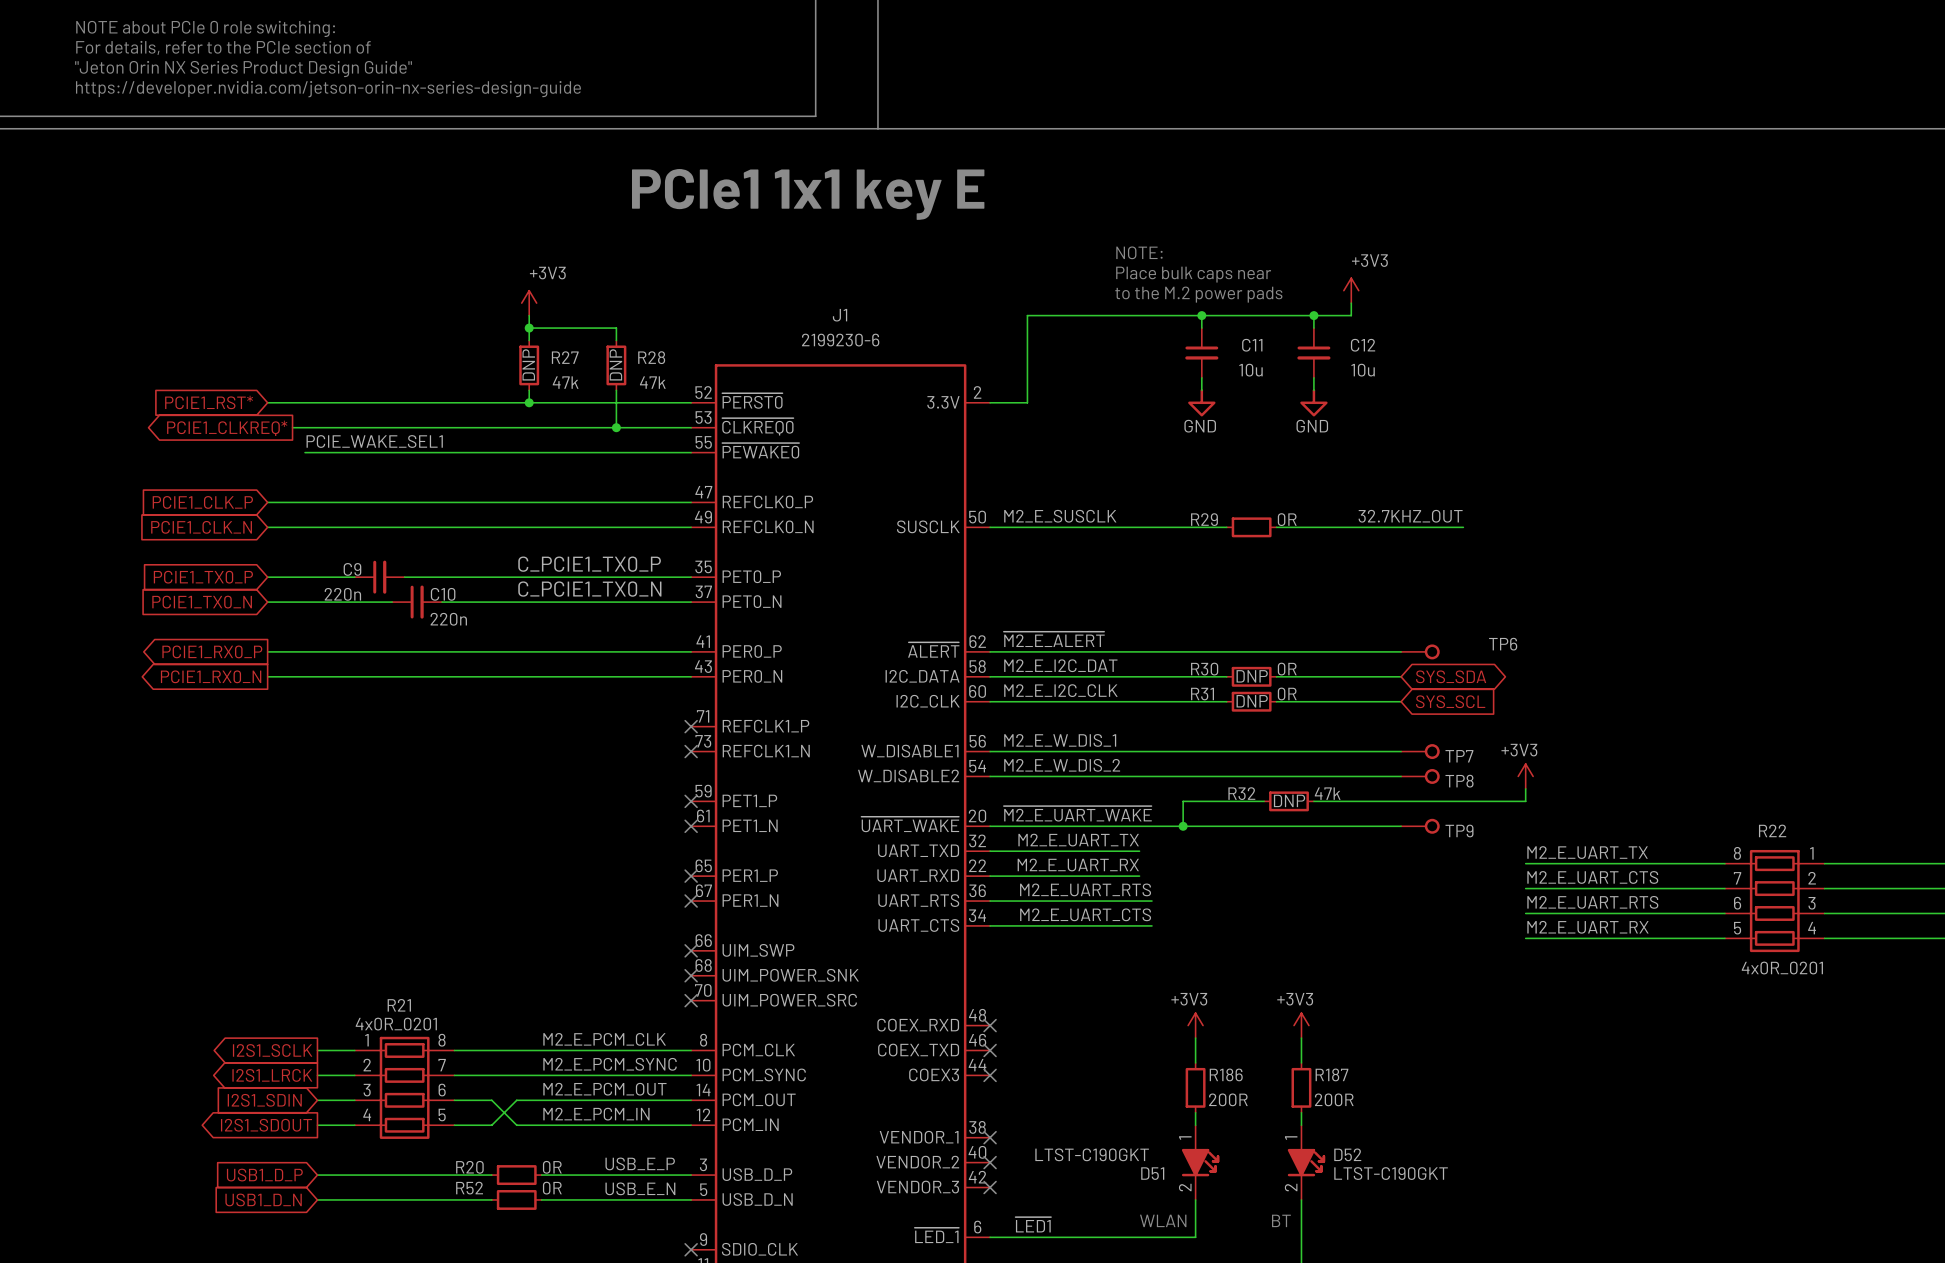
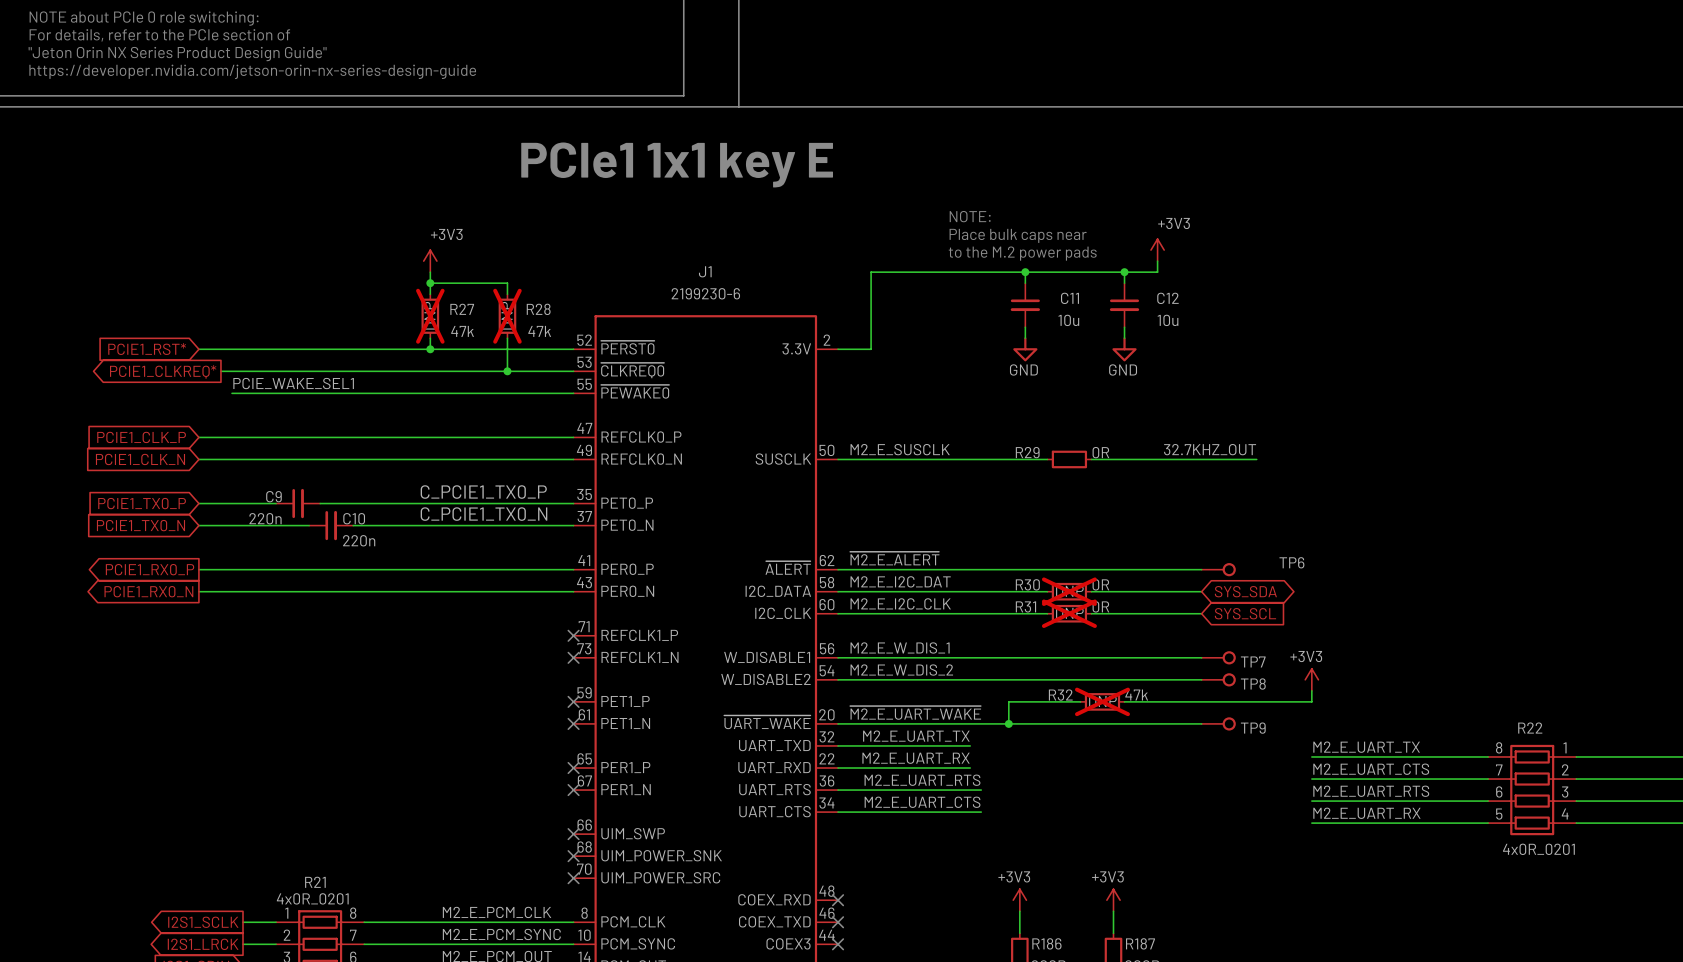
R27 do-not-place cross: none -> (430, 316)
R28 do-not-place cross: none -> (507, 316)
R30 do-not-place cross: none -> (1069, 591)
R31 do-not-place cross: none -> (1069, 613)
R32 do-not-place cross: none -> (1102, 701)

